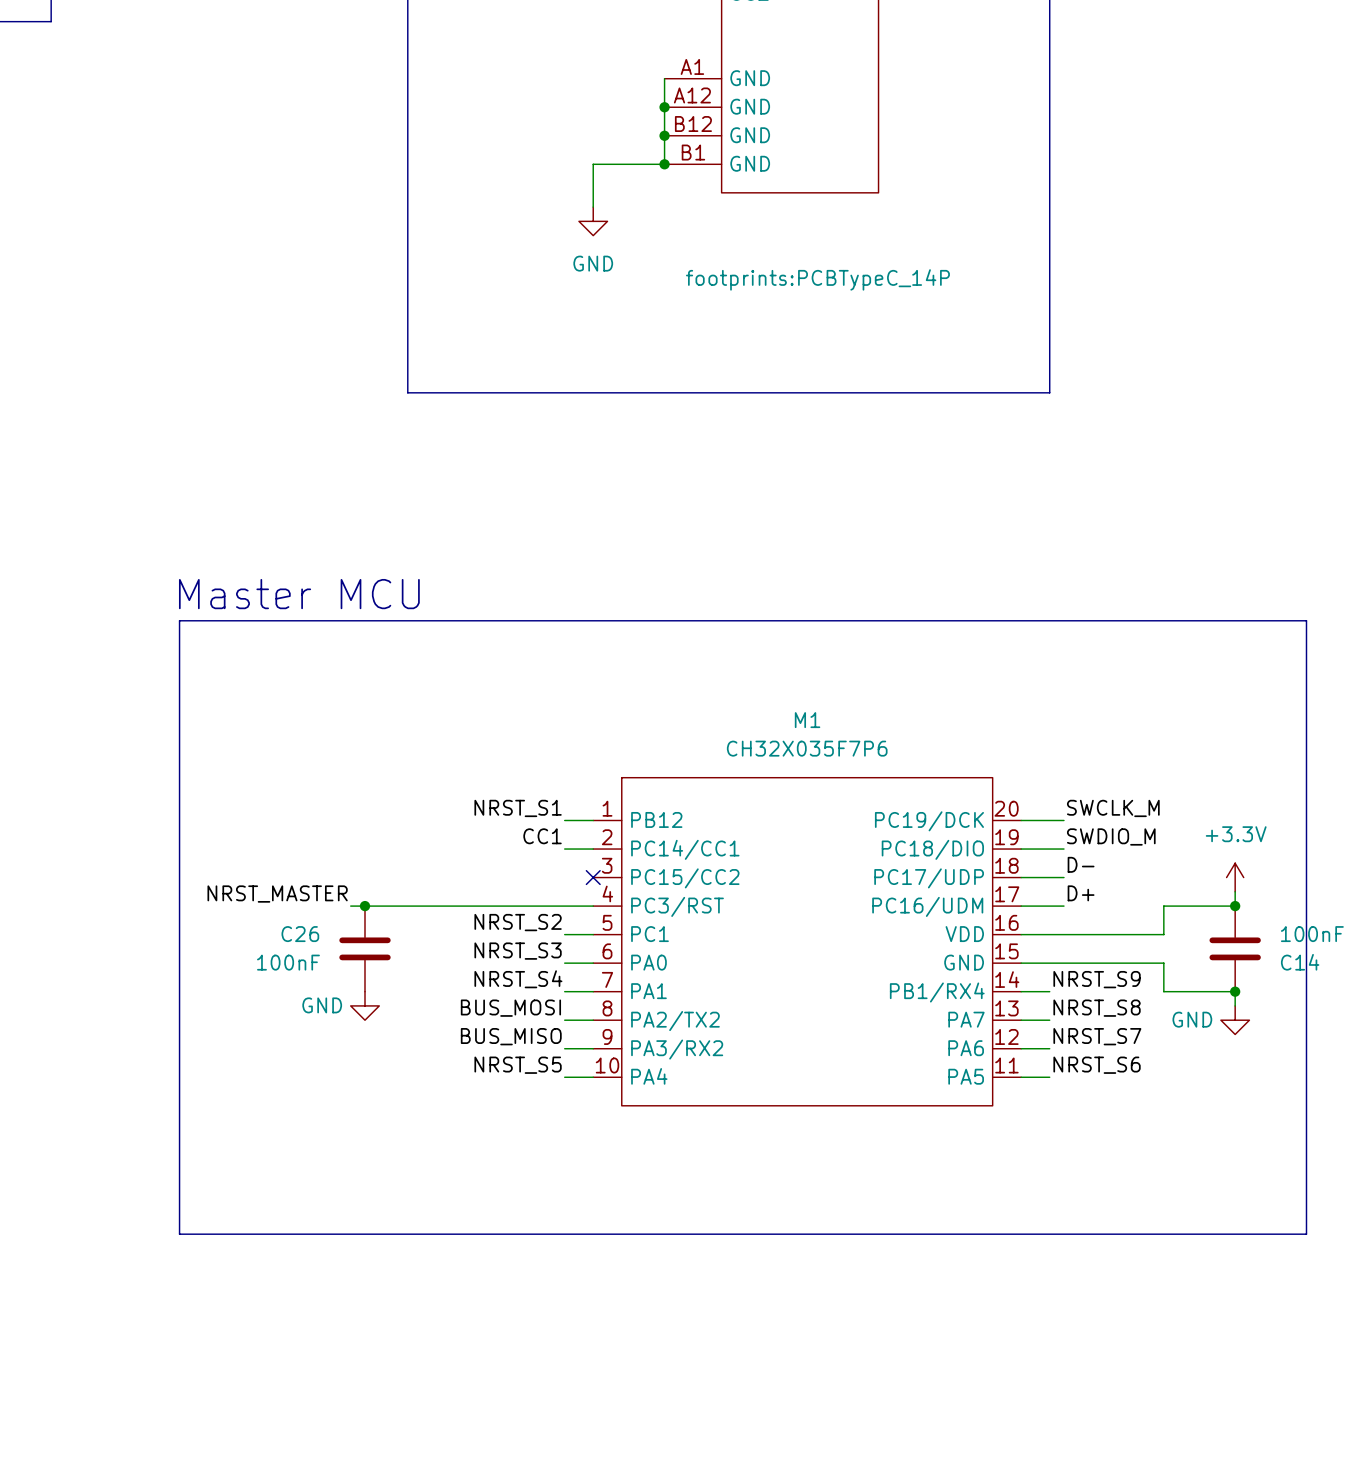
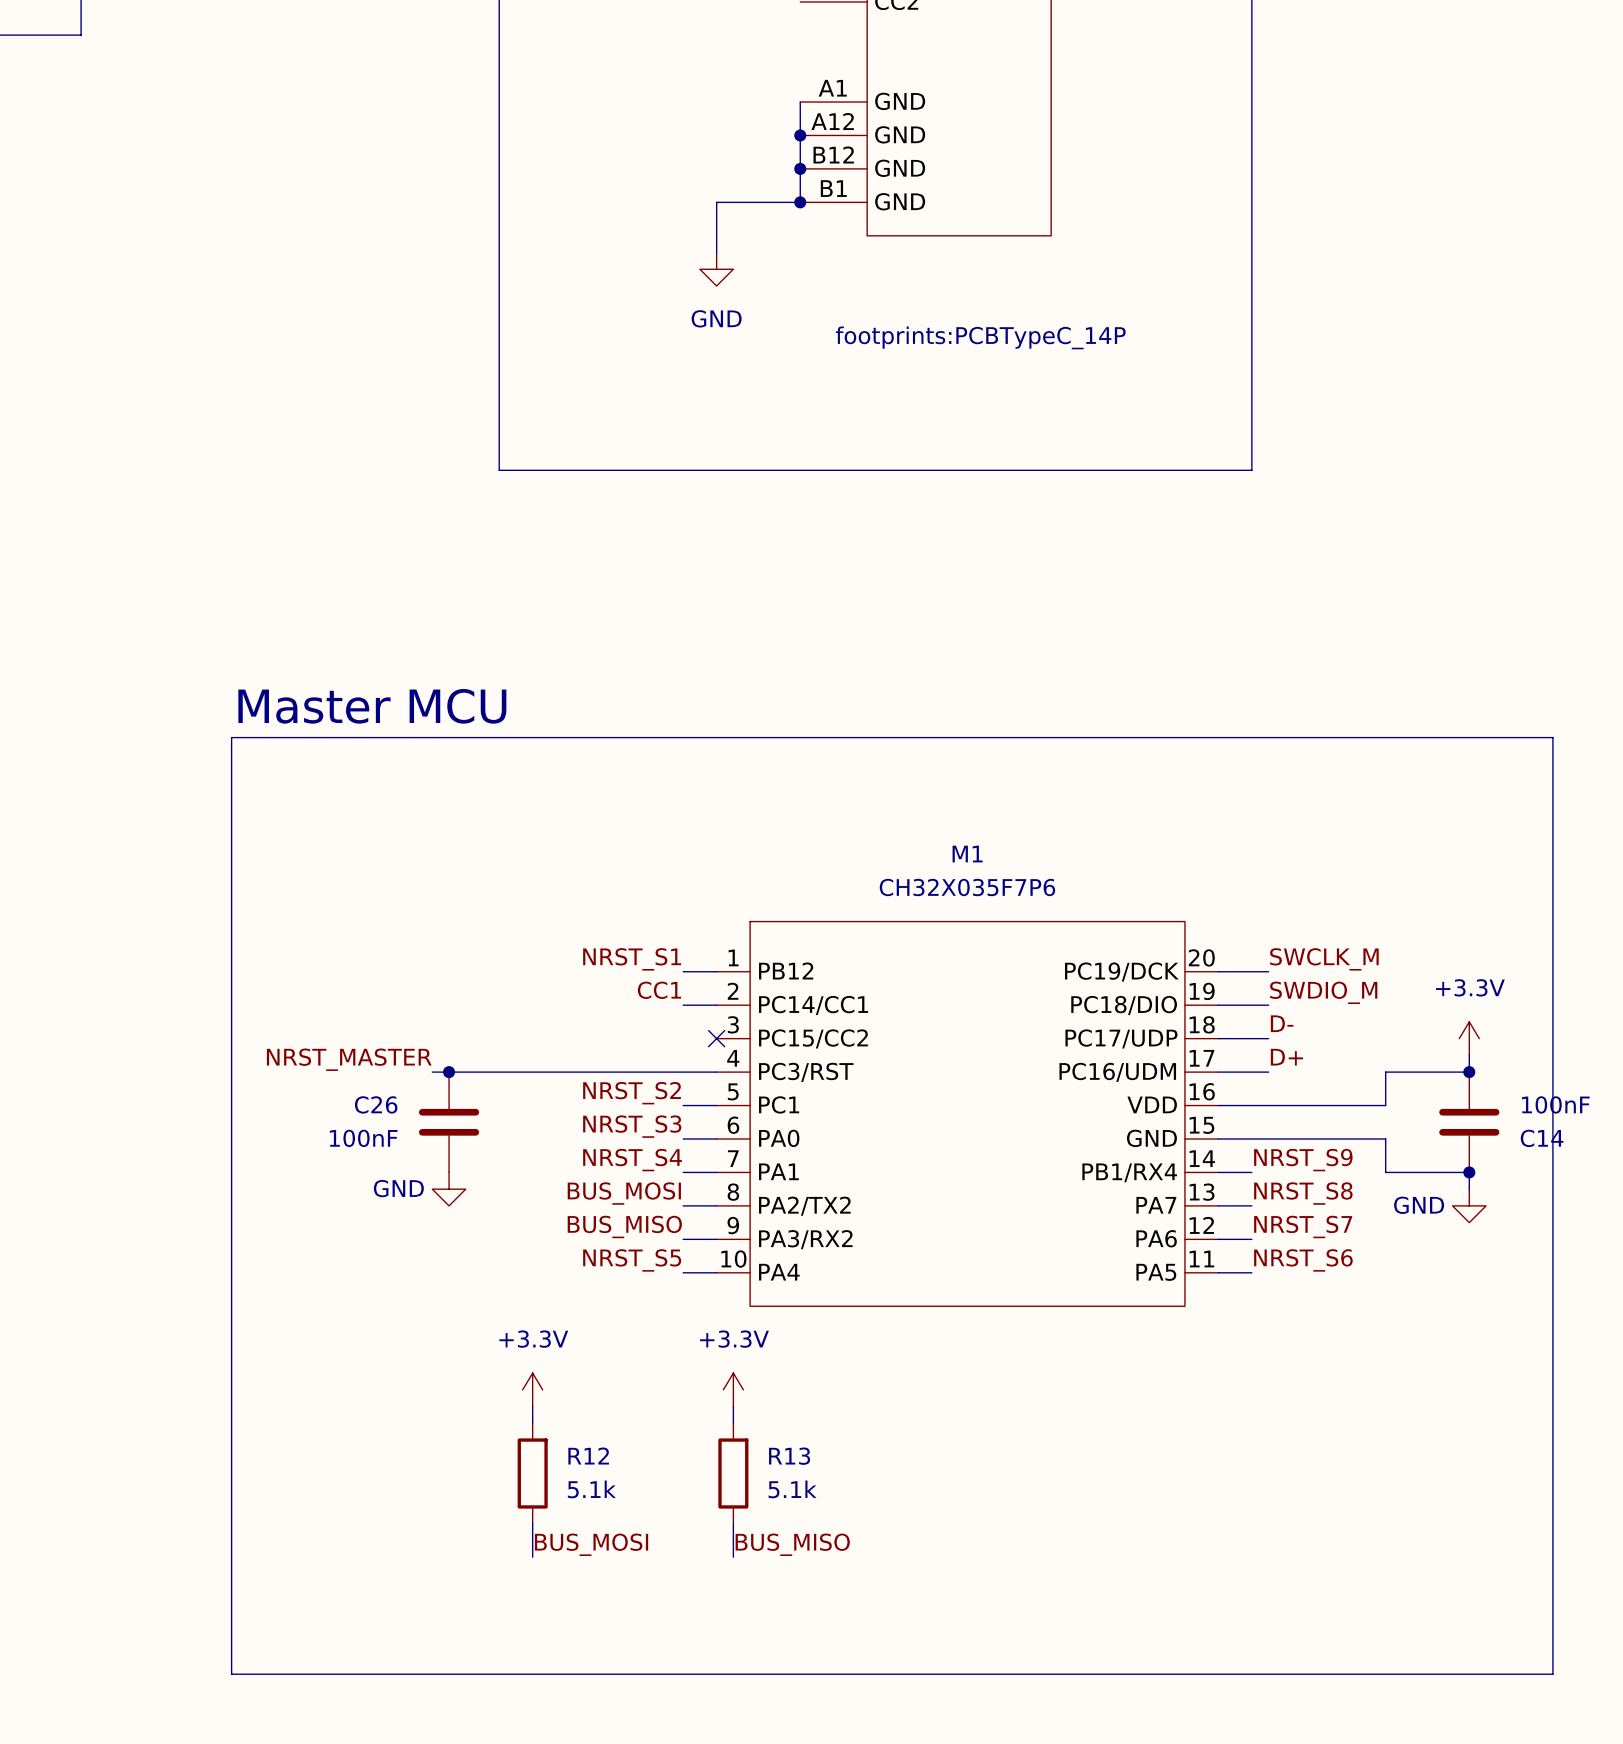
power symbol: none -> +3.3V (532, 1389)
power symbol: none -> +3.3V (733, 1389)
wire: none -> (532, 1406) (532, 1423)
wire: none -> (733, 1406) (733, 1423)
line: (179, 1234) (1306, 1234) -> (231, 1456) (231, 1674) (1552, 1674) (1552, 1456)
R12: none -> 5.1k (532, 1473)
R13: none -> 5.1k (733, 1473)
wire: none -> (532, 1523) (532, 1557)
wire: none -> (733, 1523) (733, 1557)
label: none -> BUS_MOSI (591, 1544)
label: none -> BUS_MISO (792, 1544)

